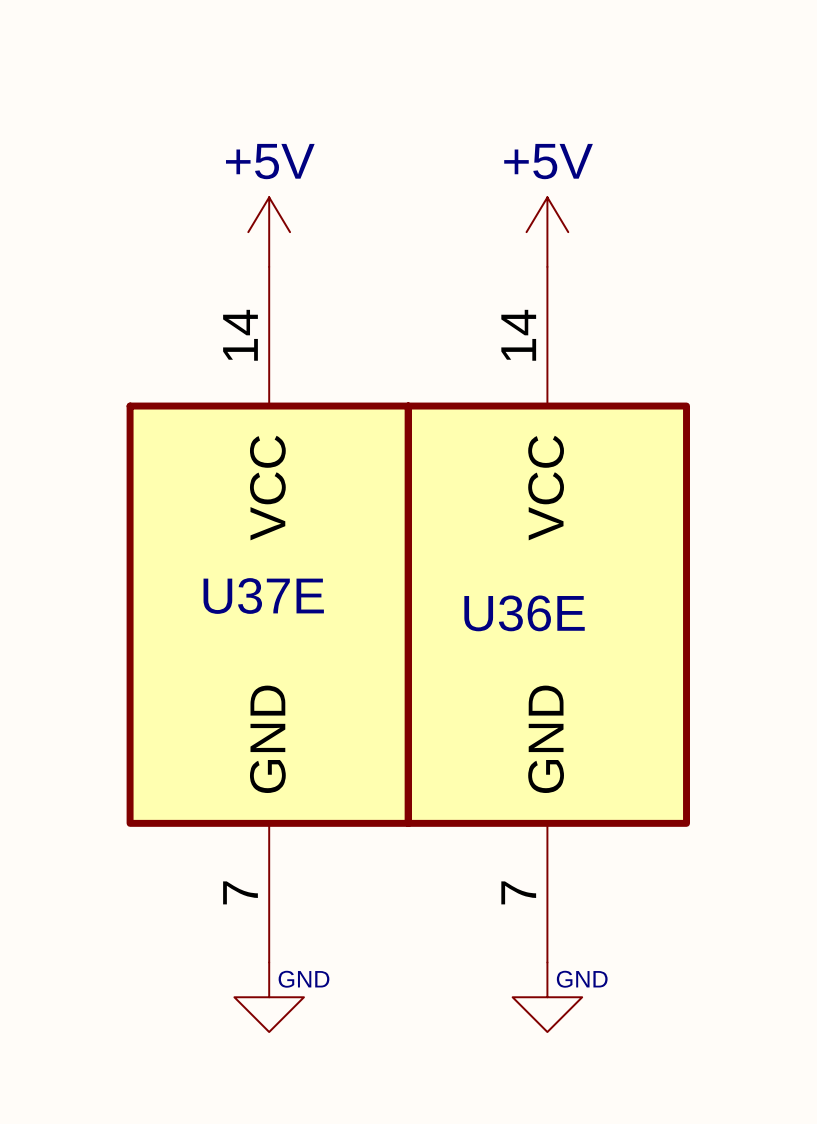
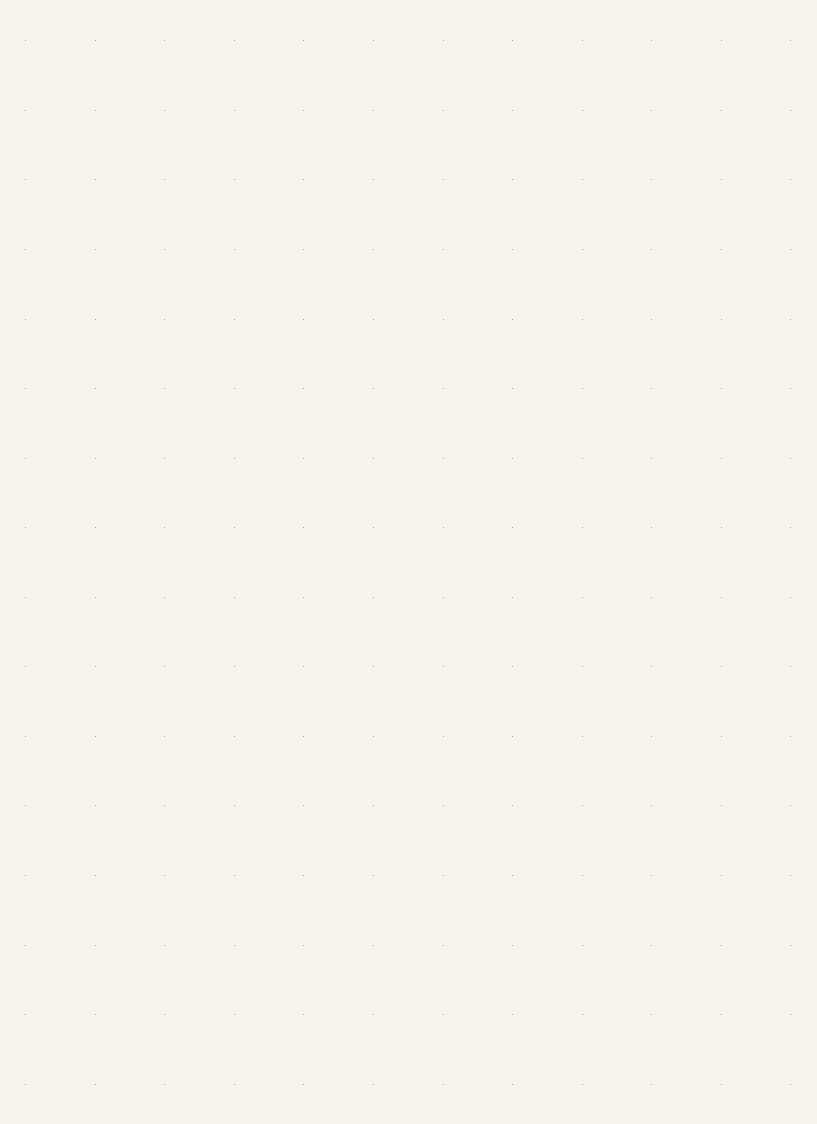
power symbol: +5V (269, 232) -> none
power symbol: +5V (547, 232) -> none
U37E: (269, 614) -> none
U36E: (547, 614) -> none
power symbol: GND (269, 997) -> none
power symbol: GND (547, 997) -> none

